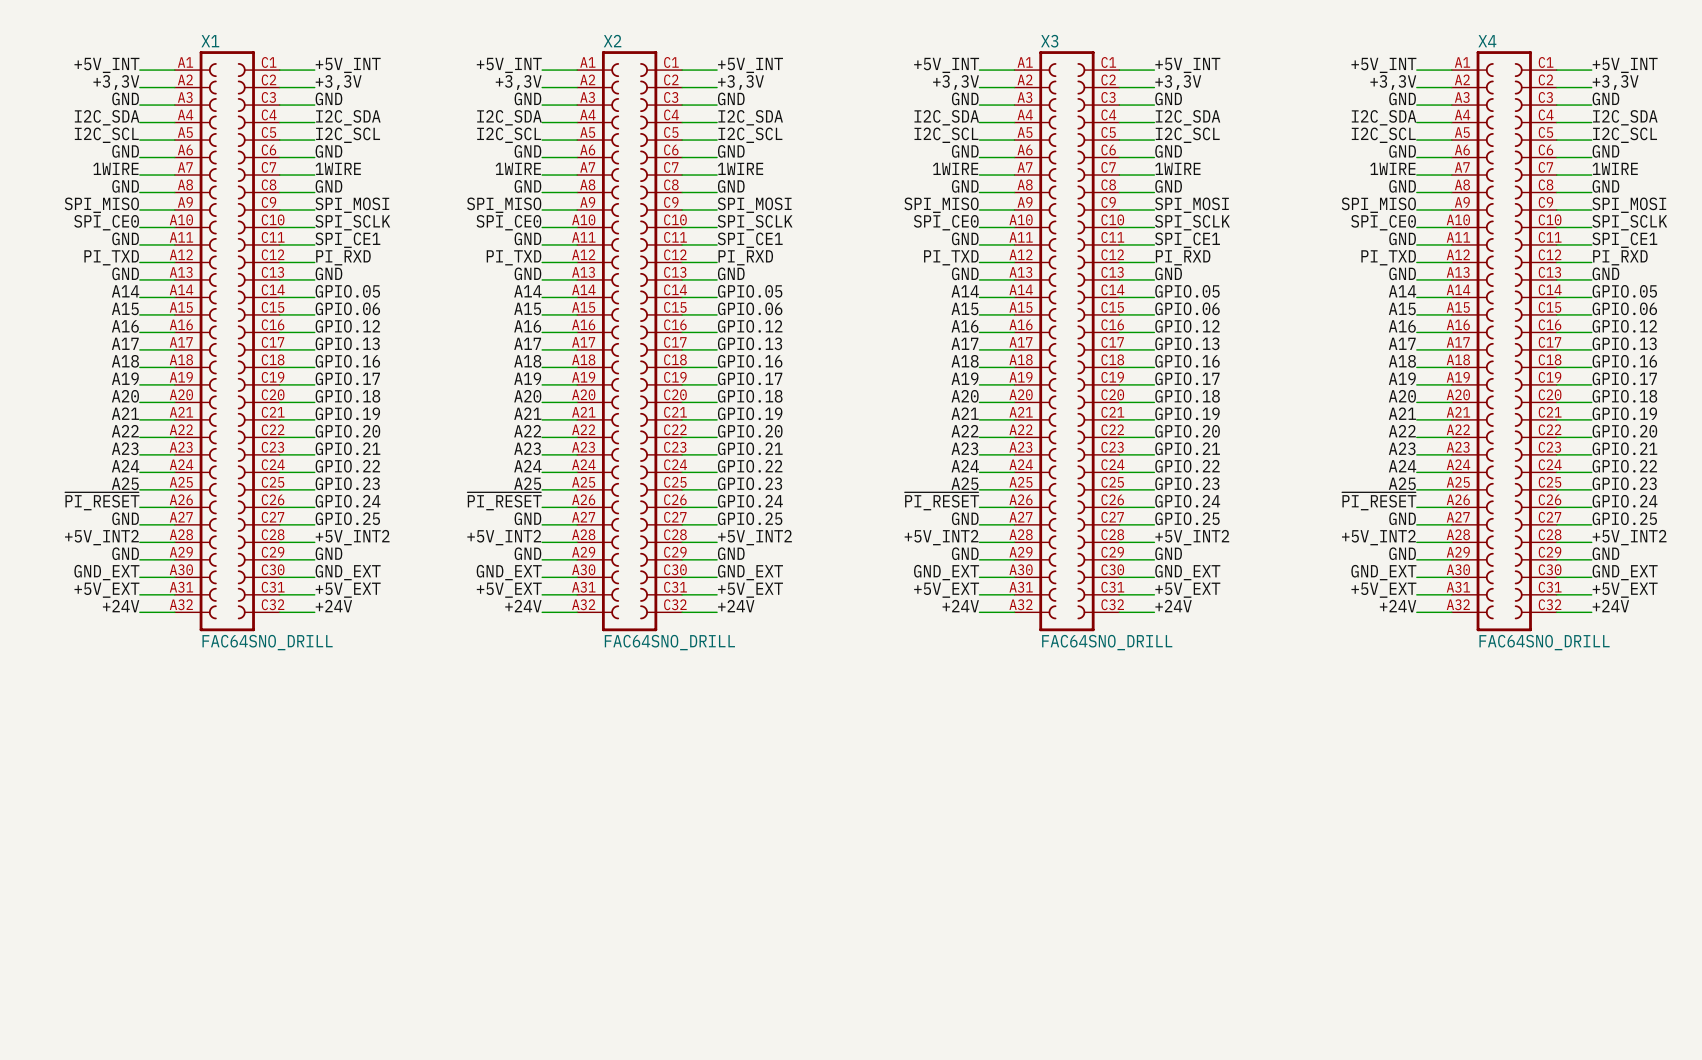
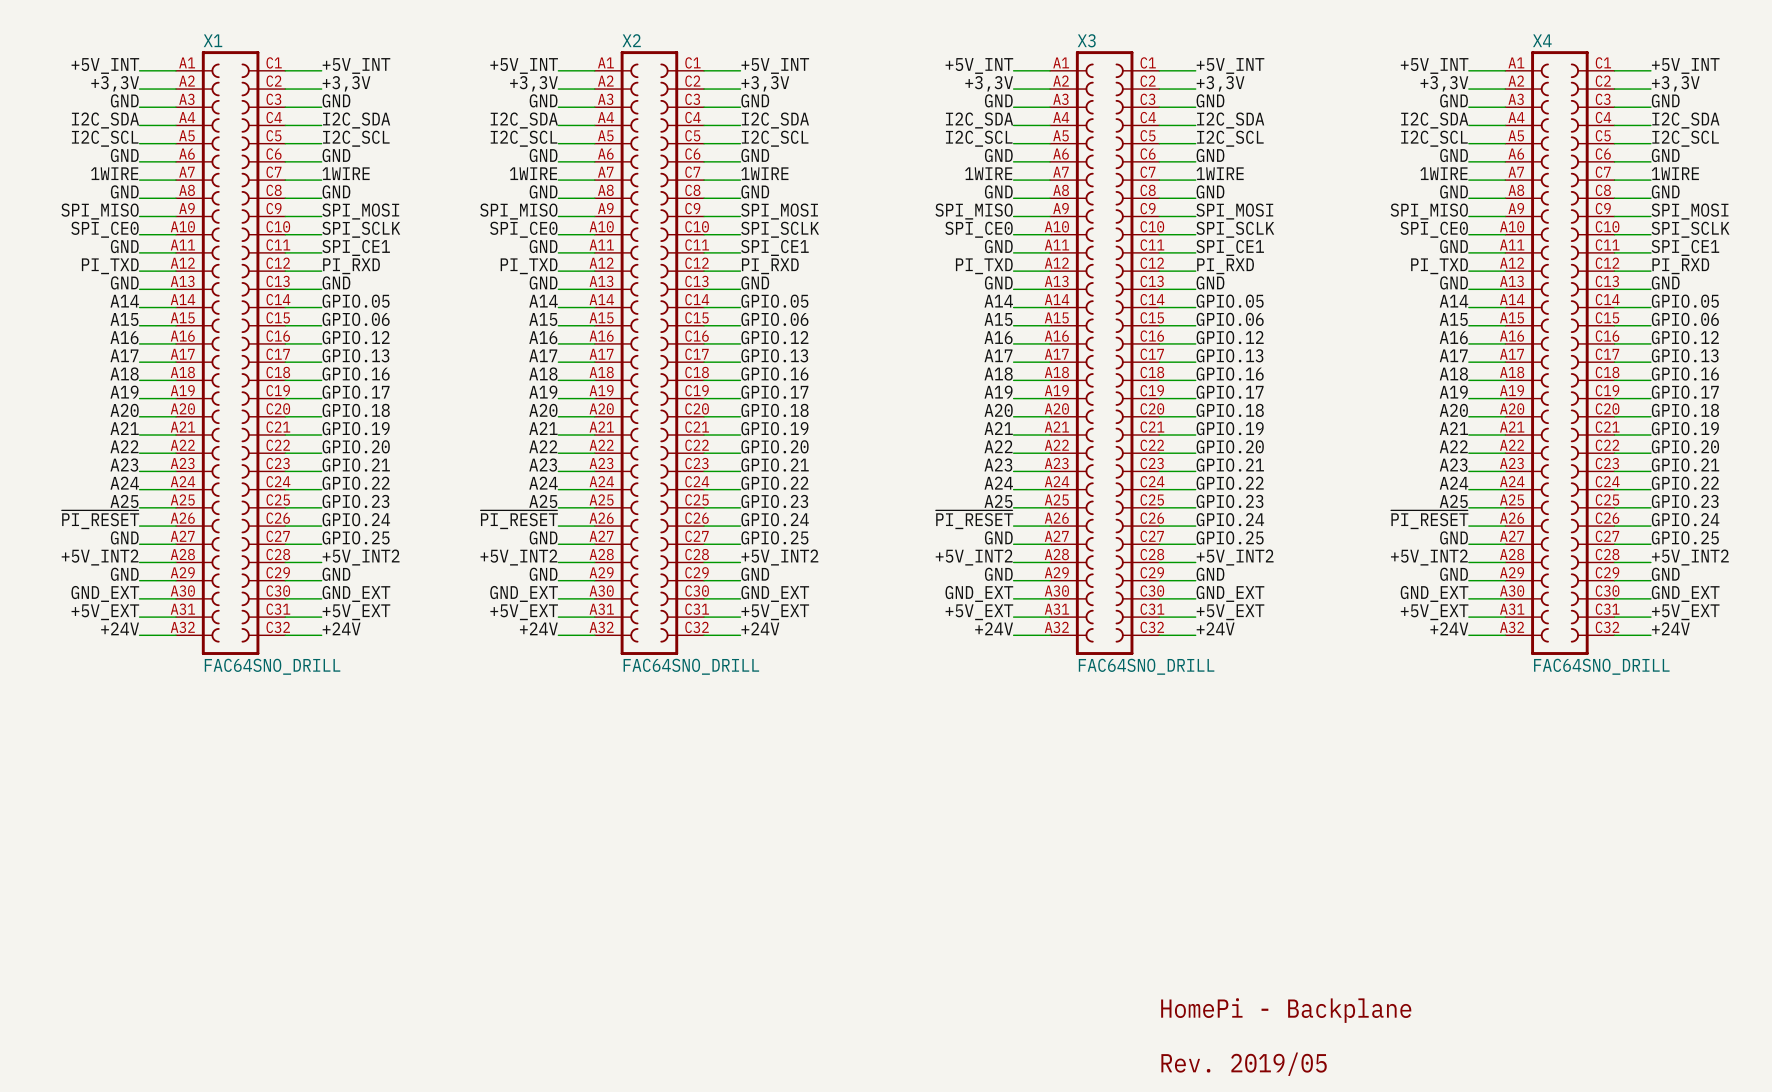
text: none -> HomePi - Backplane (1286, 1010)
text: none -> Rev. 2019/05 (1244, 1064)

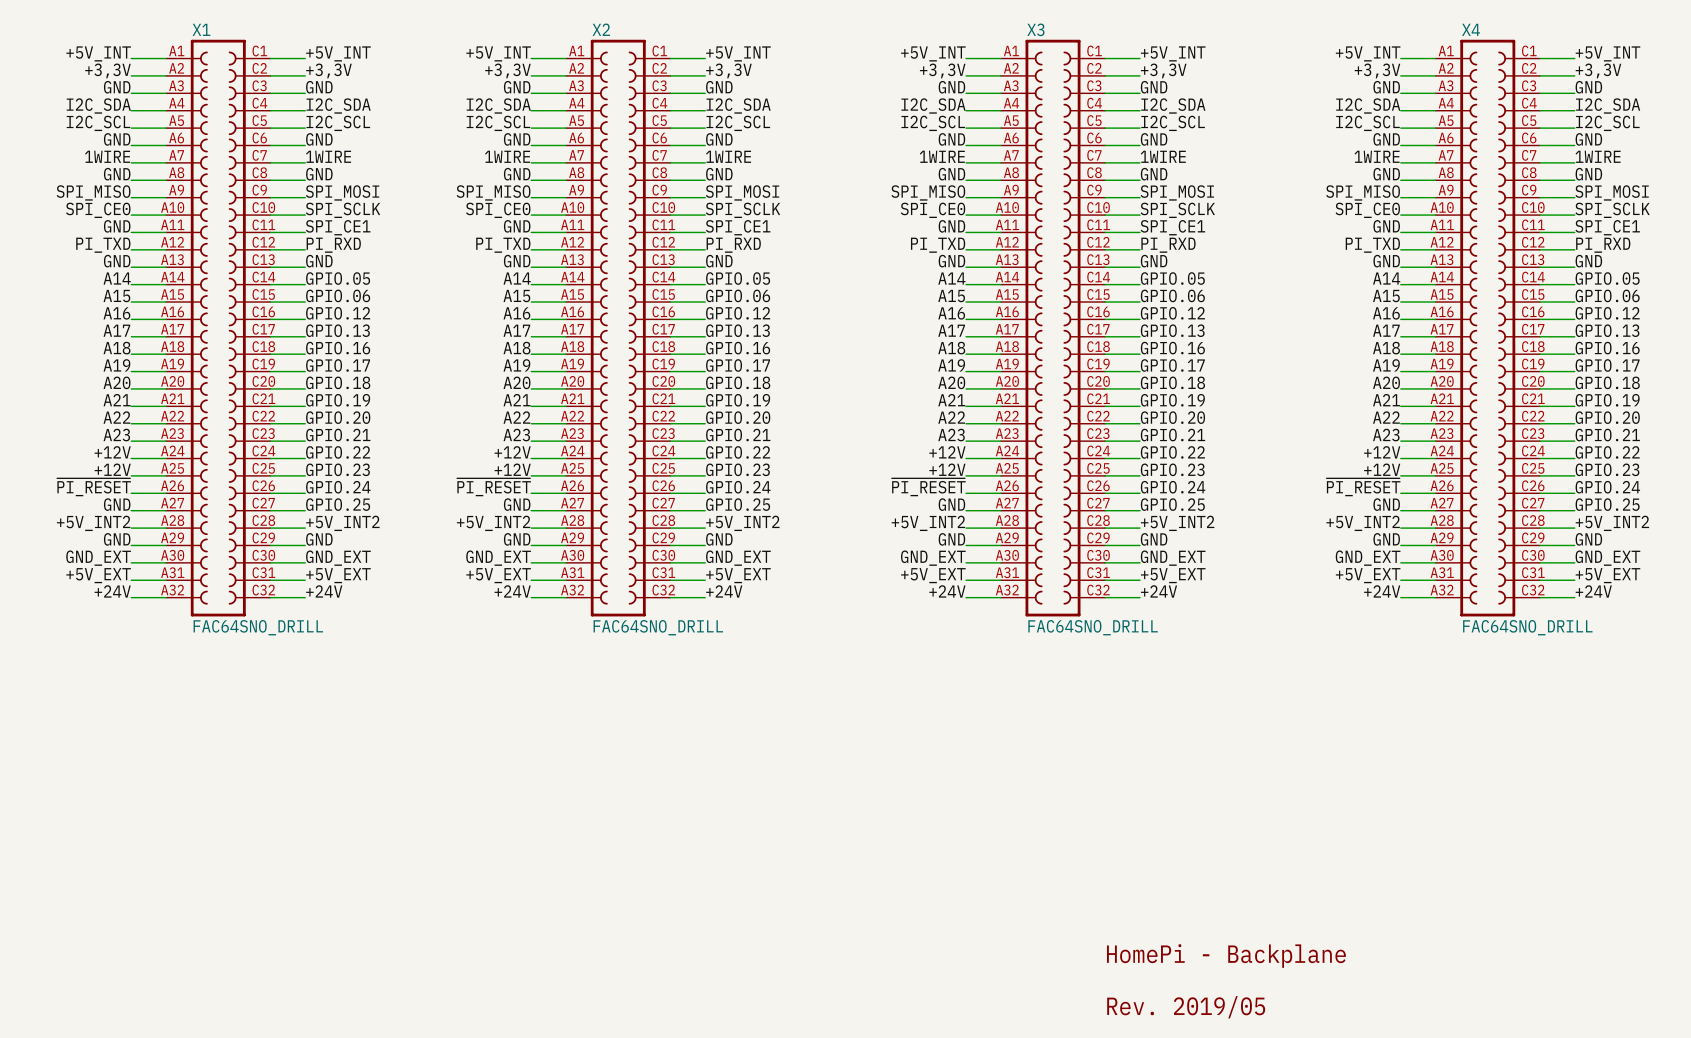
label: A24 (124, 483) -> +12V (112, 452)
label: A24 (543, 483) -> +12V (512, 452)
label: A24 (998, 483) -> +12V (947, 452)
label: A24 (1453, 483) -> +12V (1382, 452)
label: A25 (124, 501) -> +12V (112, 469)
label: A25 (543, 501) -> +12V (512, 469)
label: A25 (998, 501) -> +12V (947, 469)
label: A25 (1453, 501) -> +12V (1382, 469)

